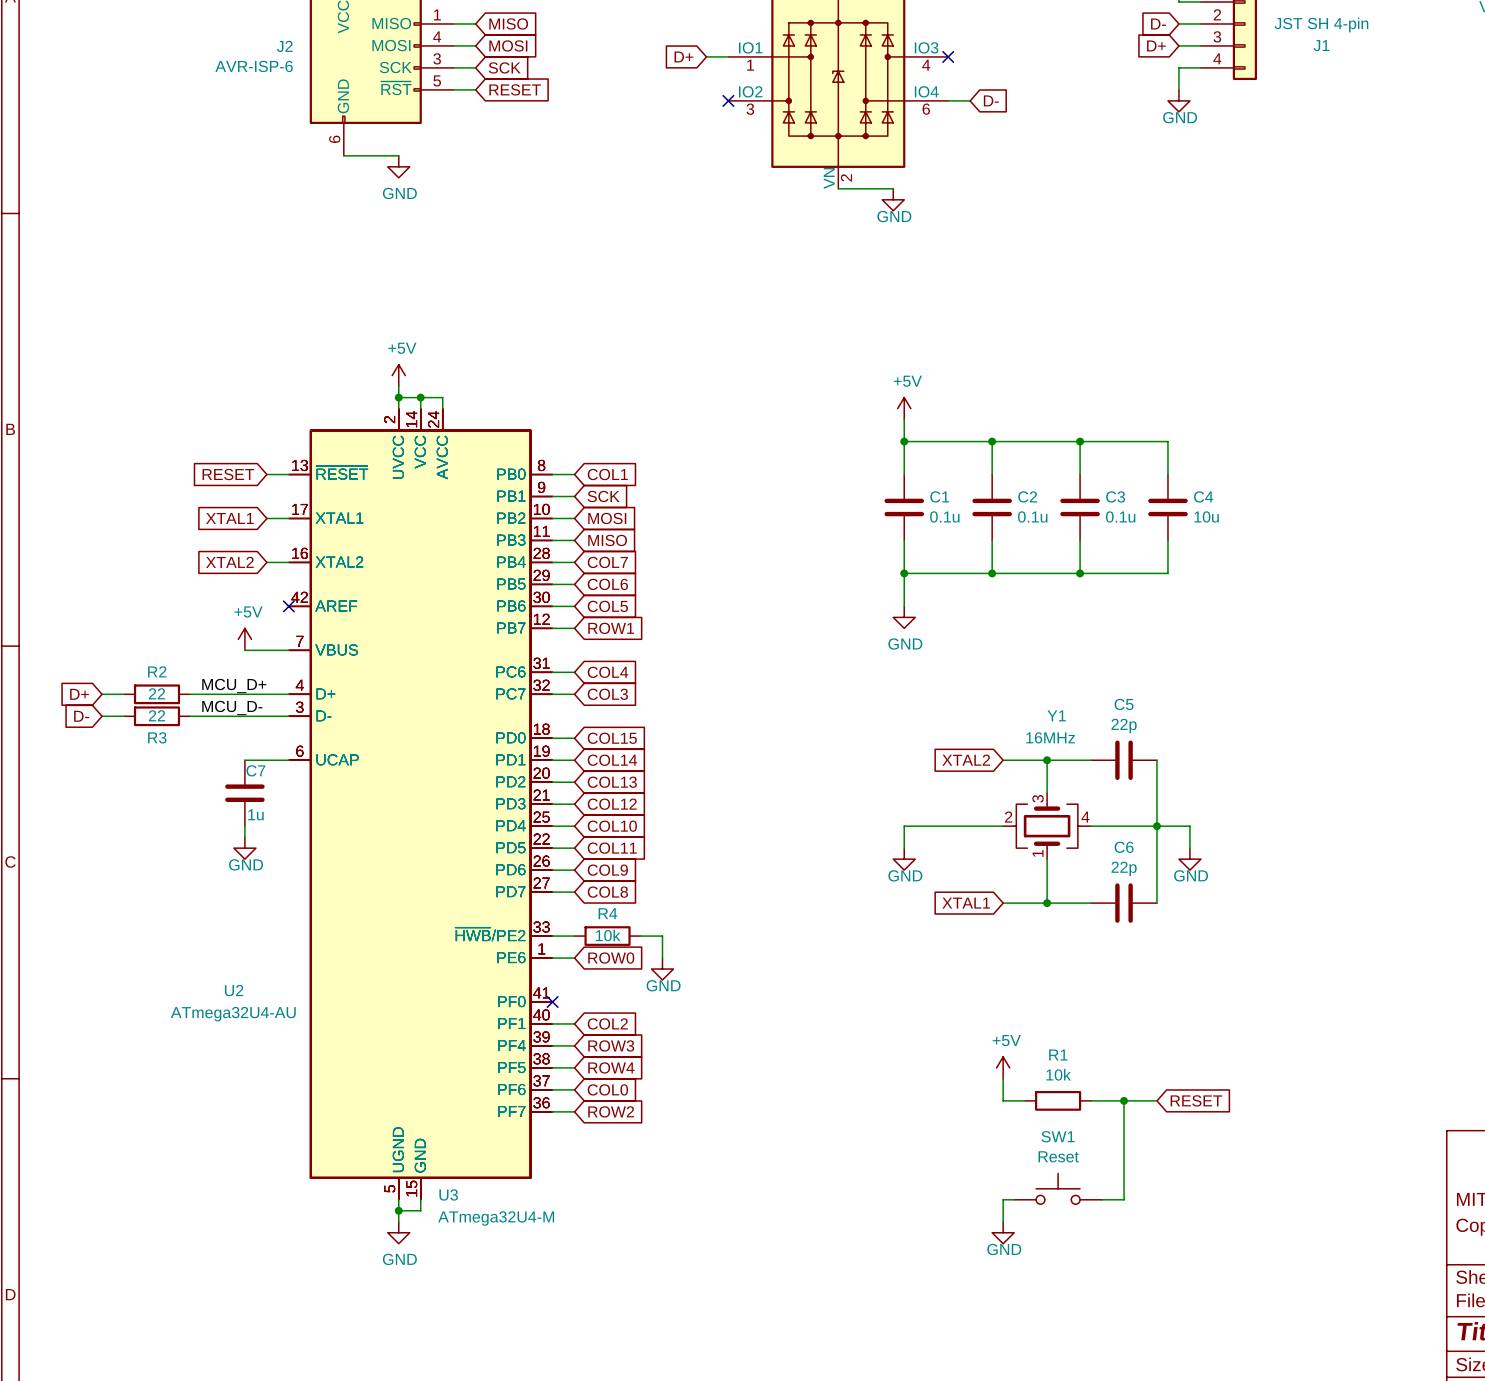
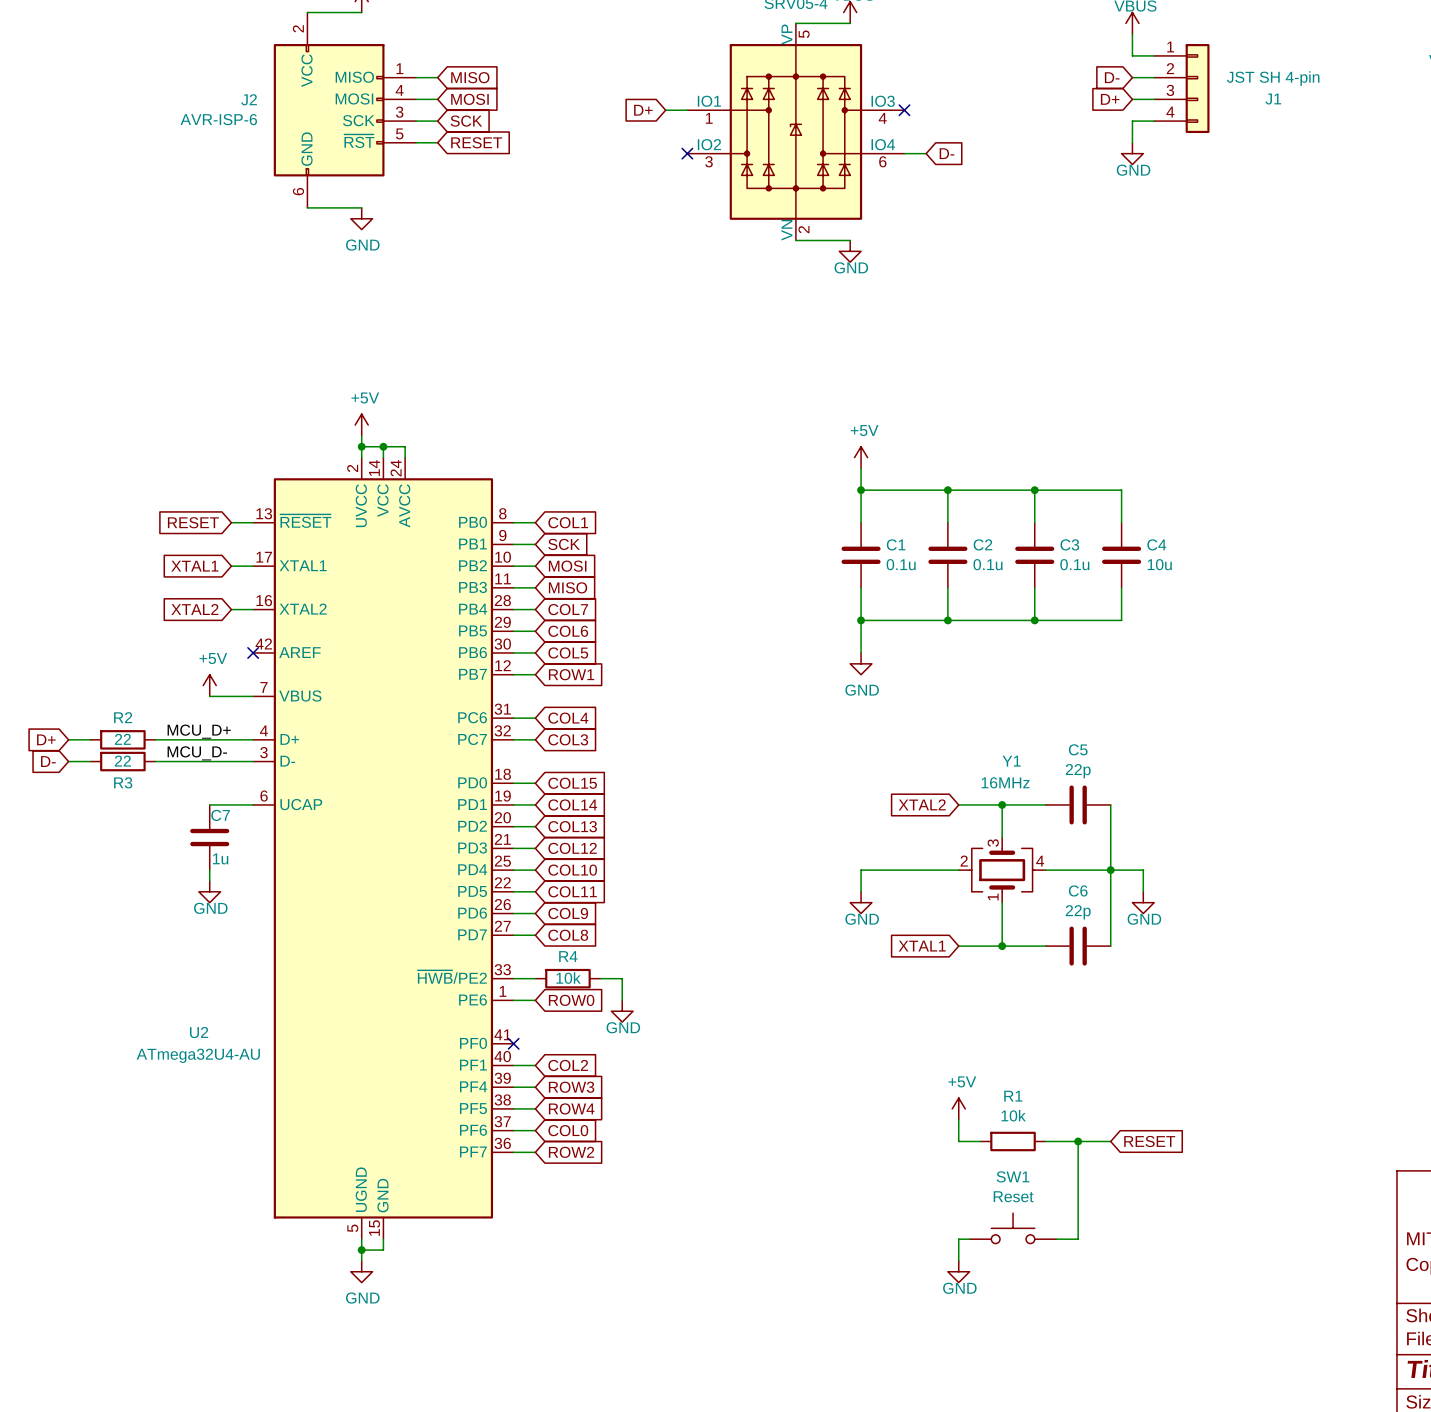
U3: ATmega32U4-M (420, 804) -> none

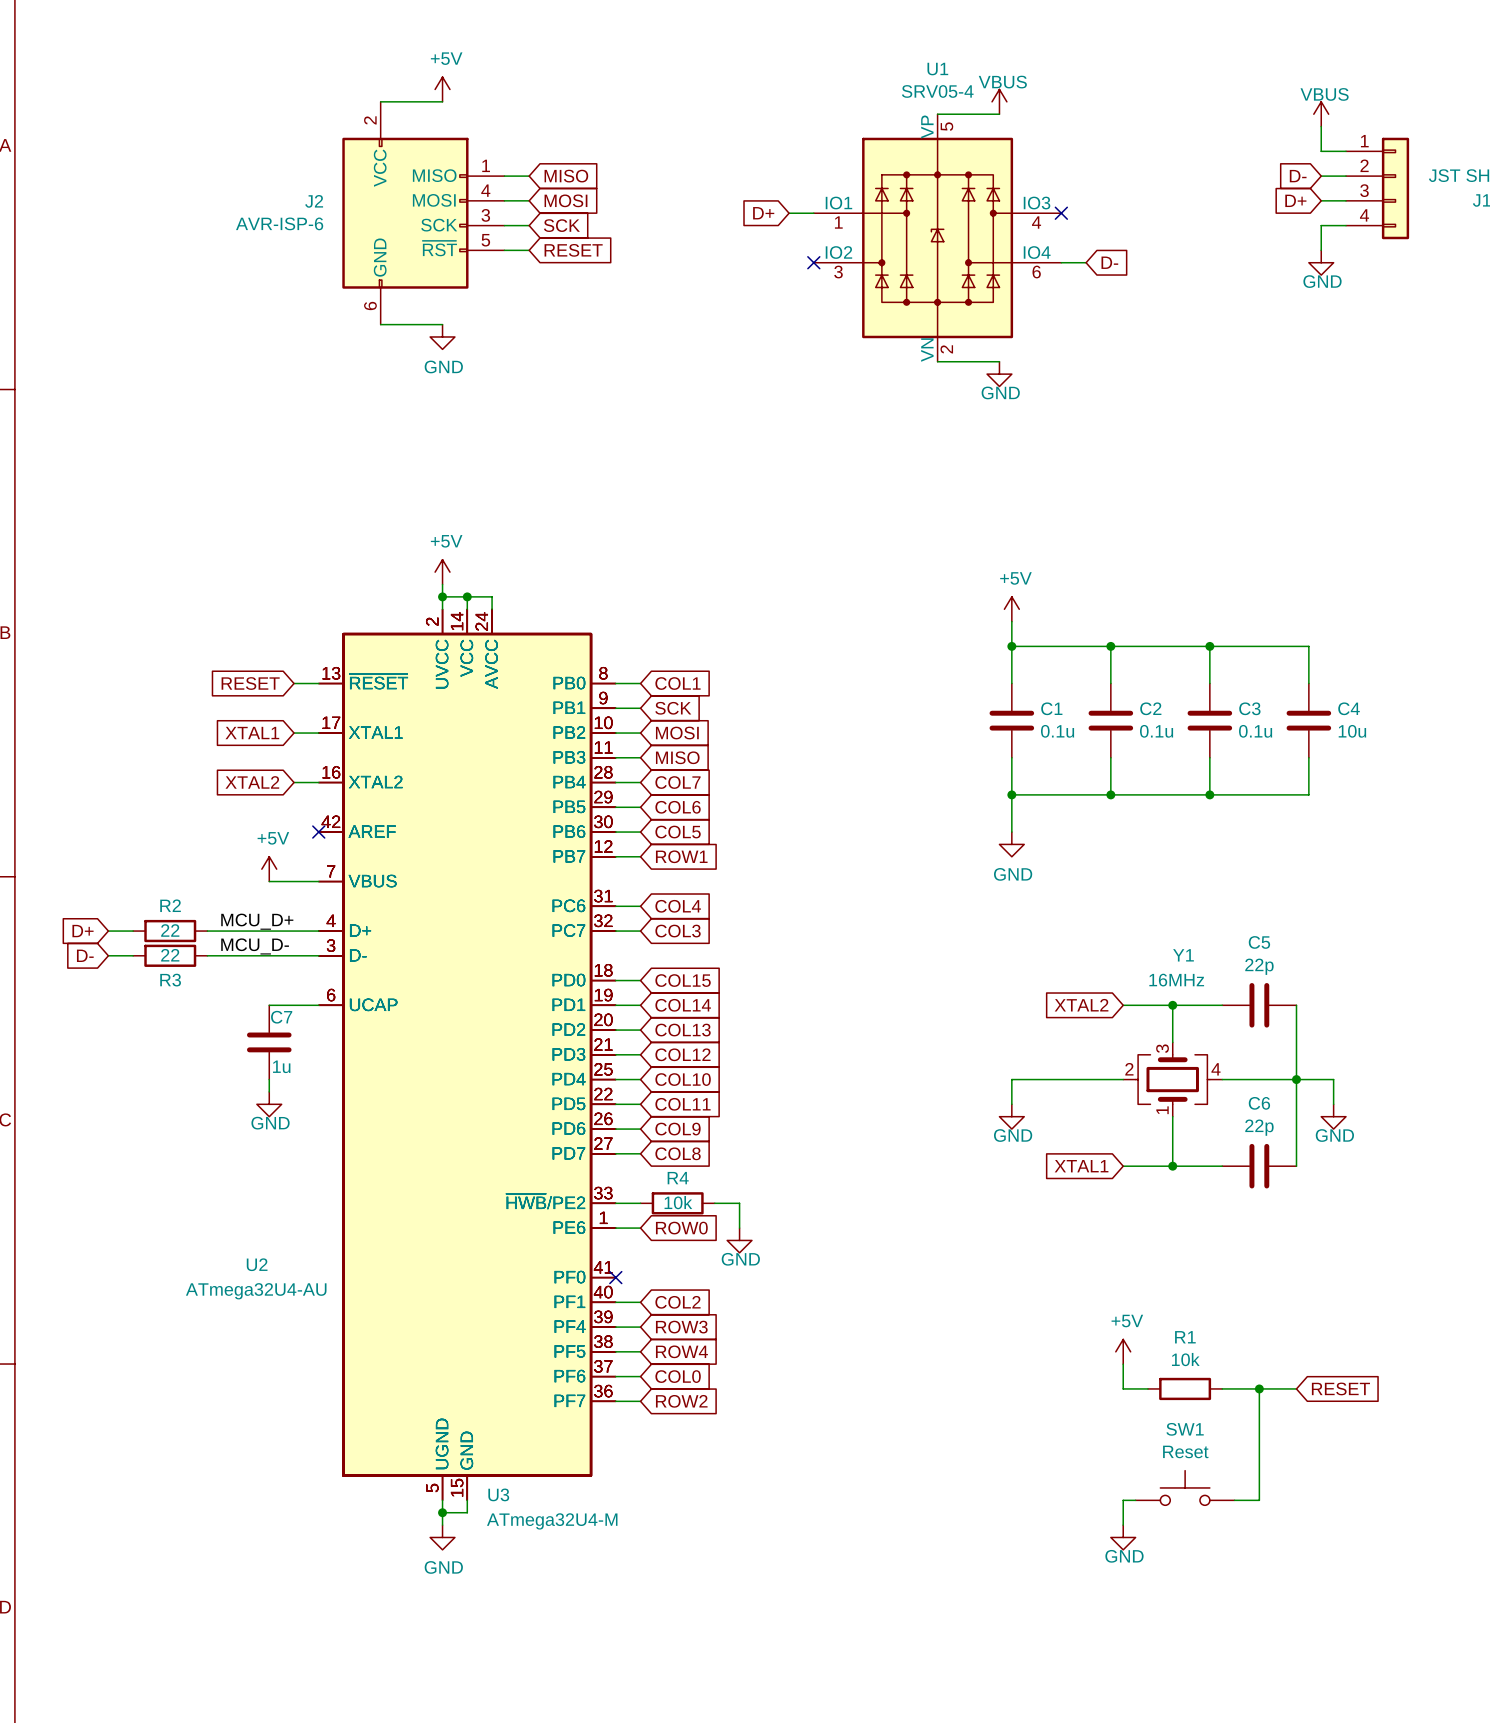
U3: none -> ATmega32U4-M (467, 1054)

